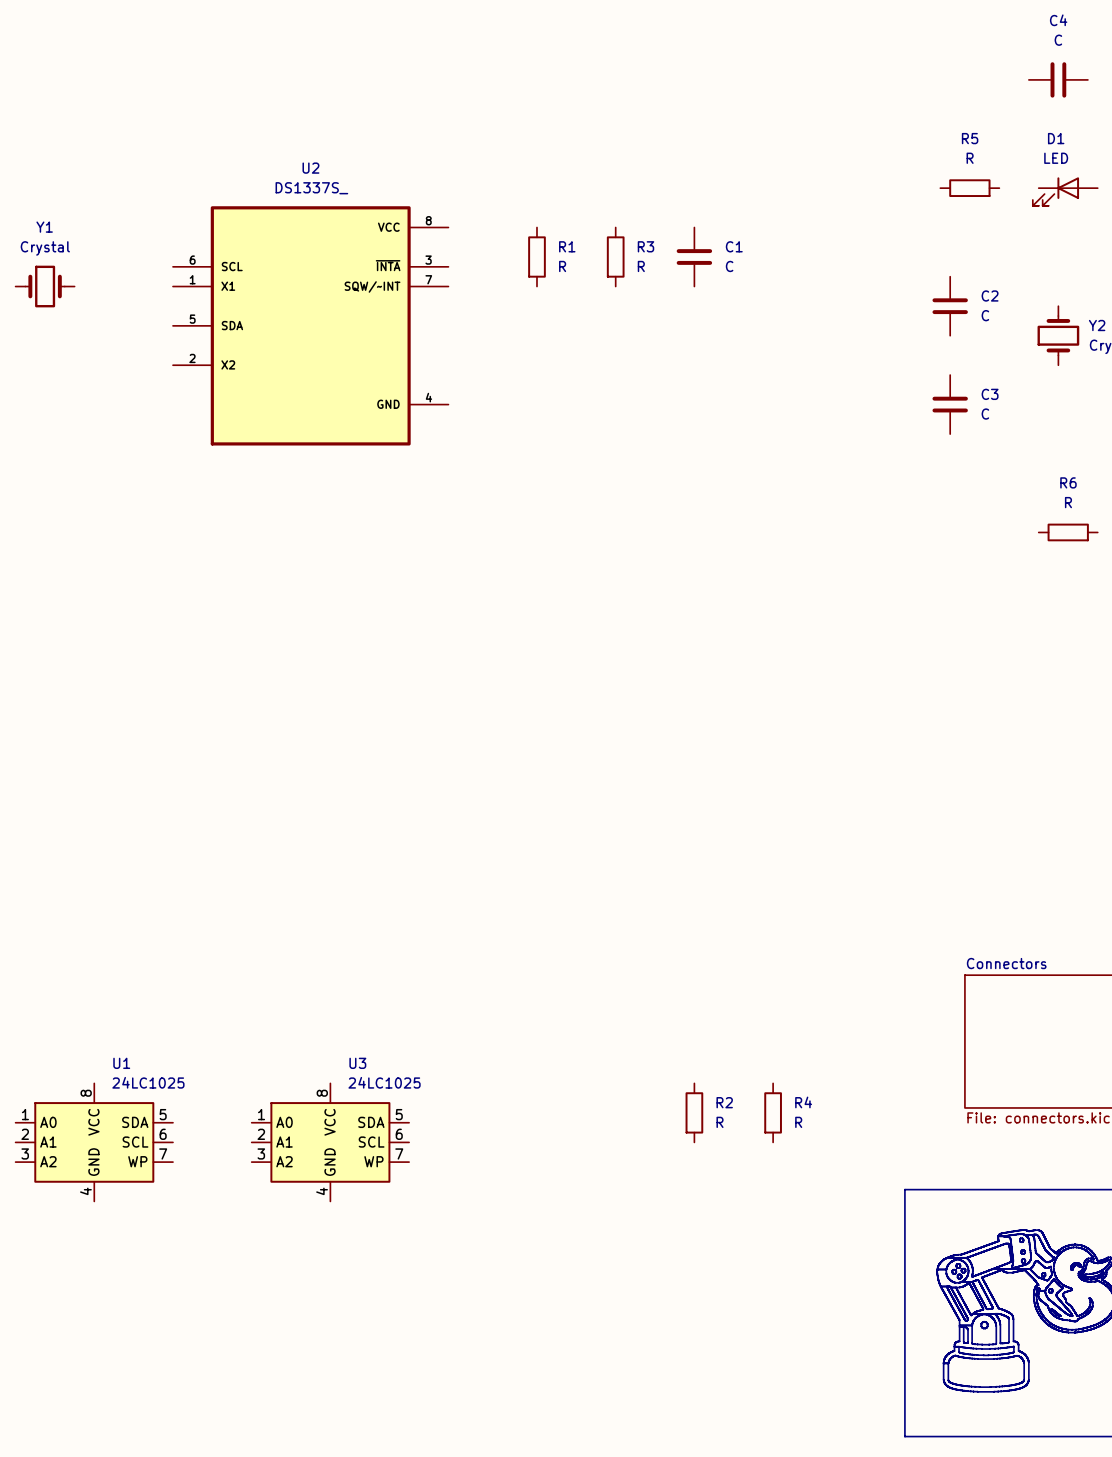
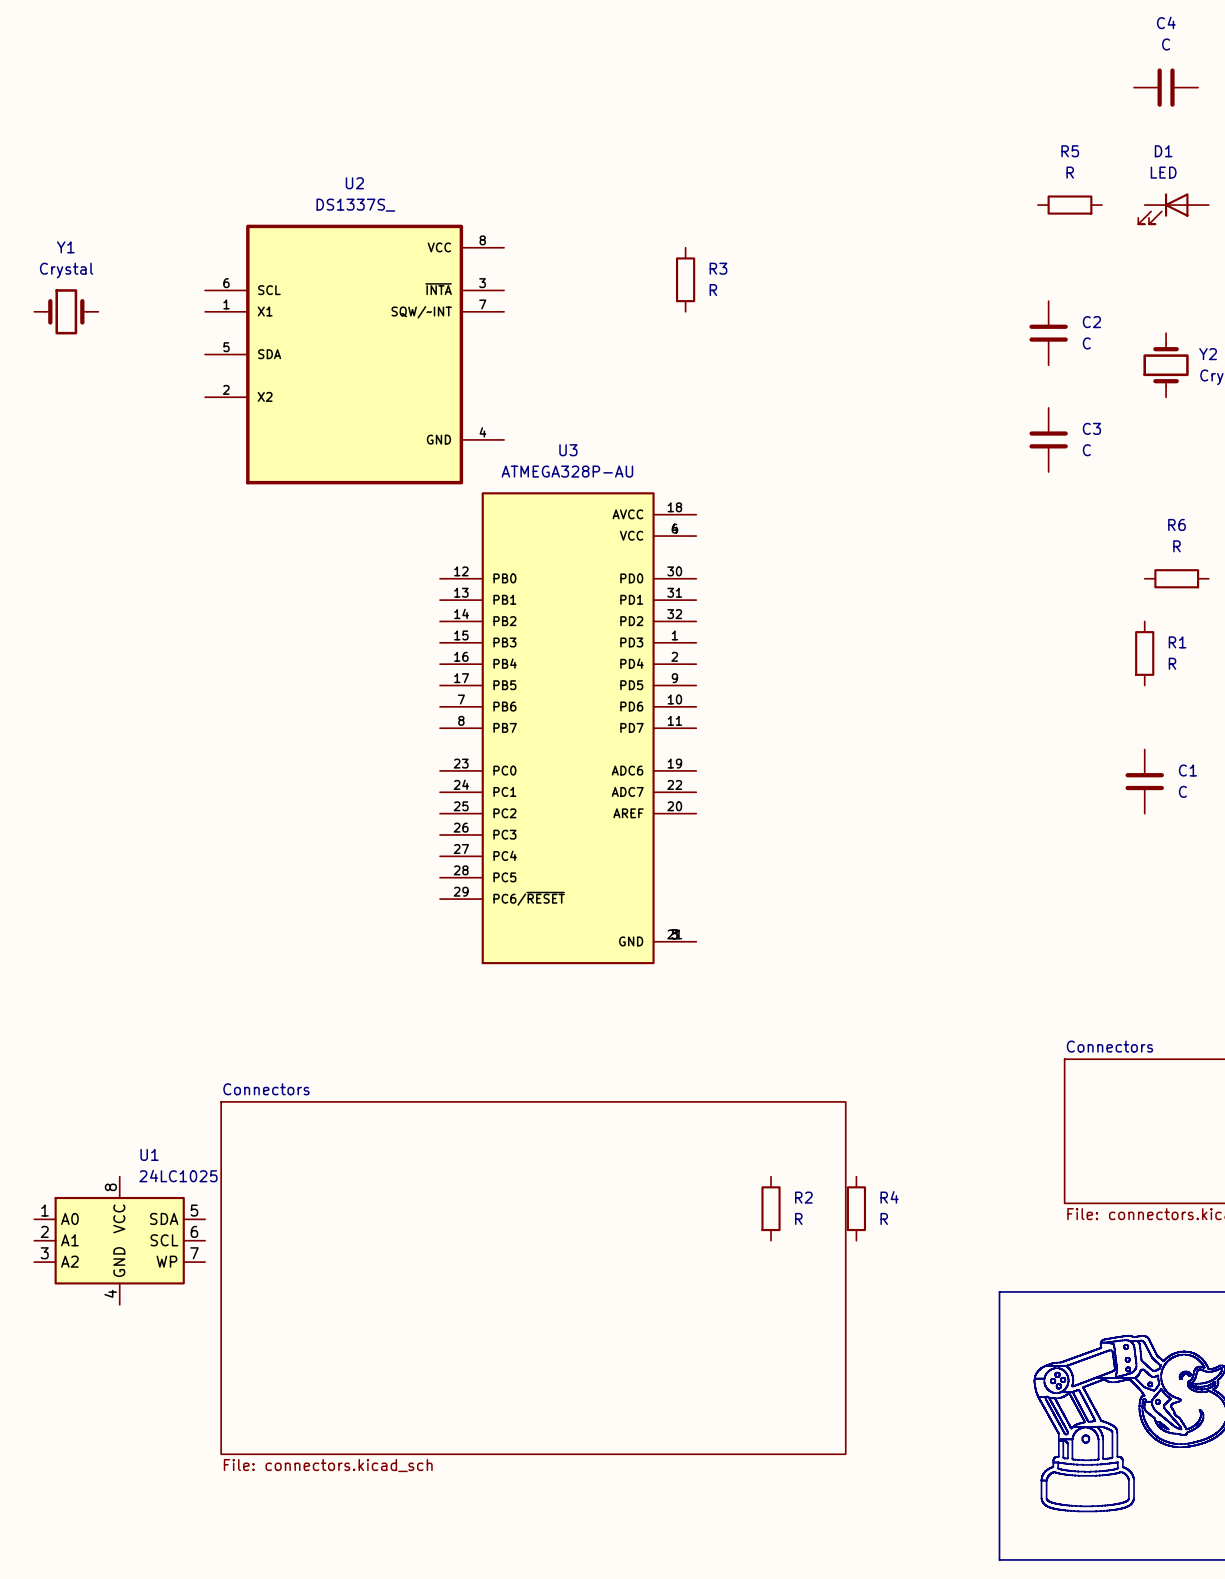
R1 position: (536, 257) -> (1144, 653)
C1 position: (694, 257) -> (1144, 781)
U3 name position: U3 (357, 1063) -> U3 (568, 450)
U3 value: 24LC1025 (384, 1082) -> ATMEGA328P-AU (567, 471)
U3 symbol: [251, 1083, 410, 1202] -> [440, 492, 697, 965]
sheet Connectors: none -> File: connectors.kicad_sch (533, 1278)

